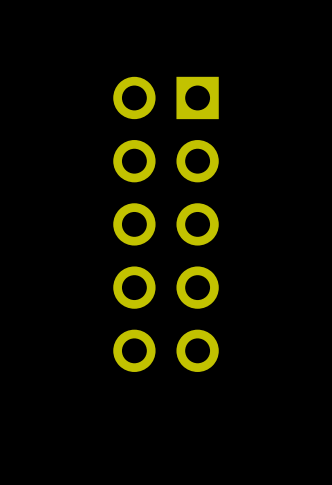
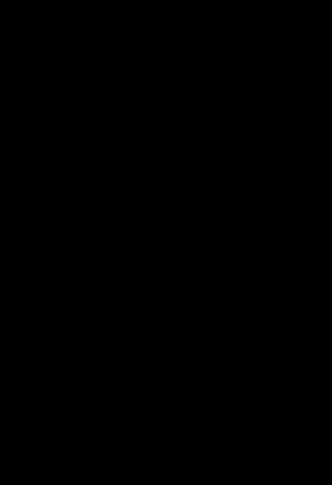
part: (166, 224) -> none

